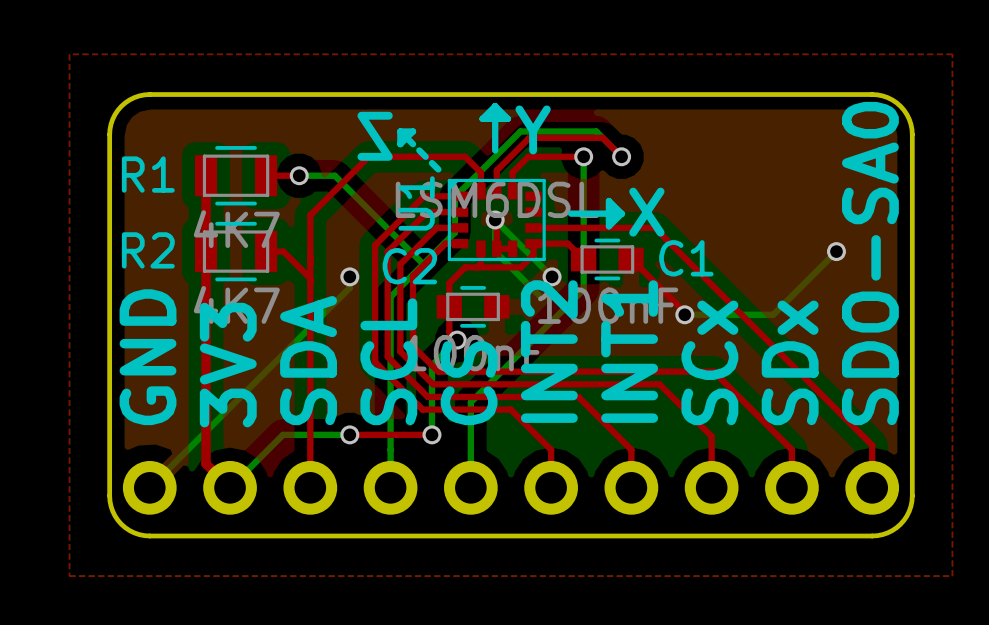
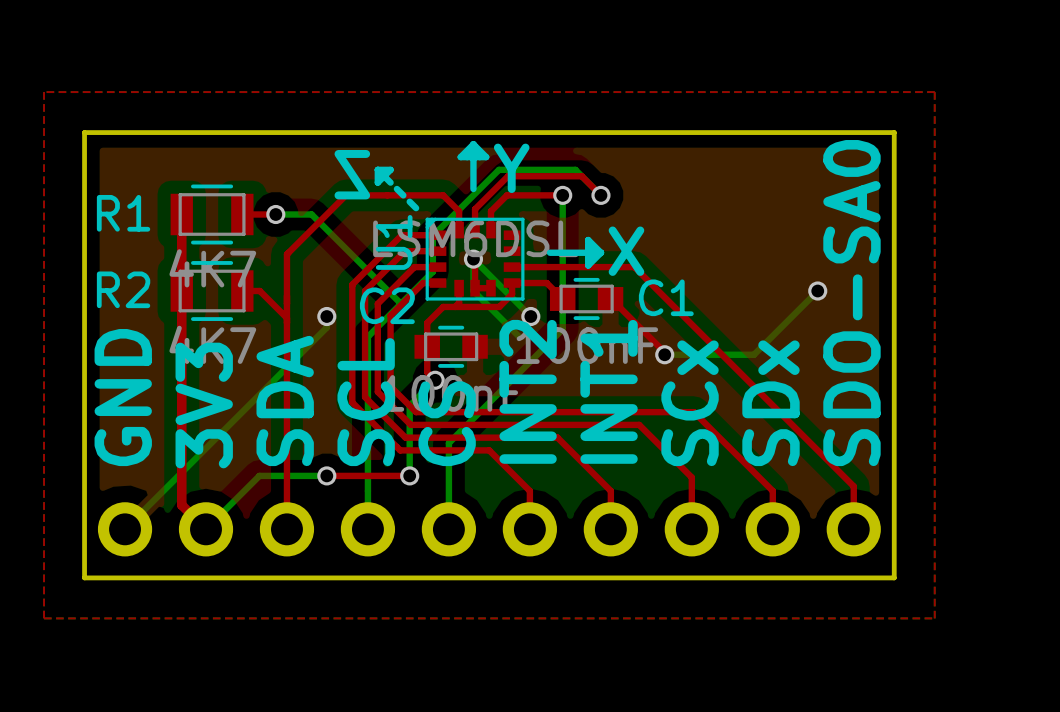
board edge: (149, 94) (134, 97) (121, 106) (112, 119) (109, 134) -> (125, 132) (84, 132) (84, 173)
board edge: (872, 94) (887, 97) (900, 106) (909, 119) (912, 134) -> (853, 132) (894, 132) (894, 173)
board edge: (109, 495) (112, 511) (121, 524) (134, 532) (149, 536) -> (84, 537) (84, 577) (125, 577)
board edge: (912, 495) (909, 511) (900, 524) (887, 532) (872, 536) -> (894, 537) (894, 577) (853, 577)

